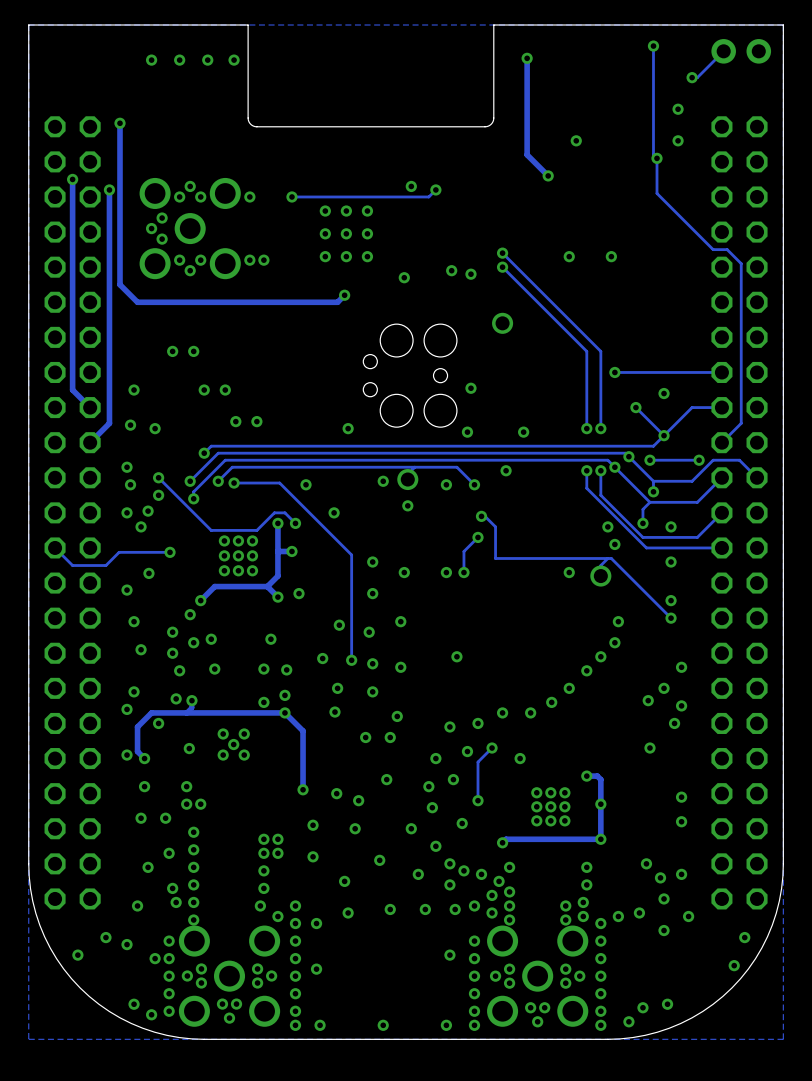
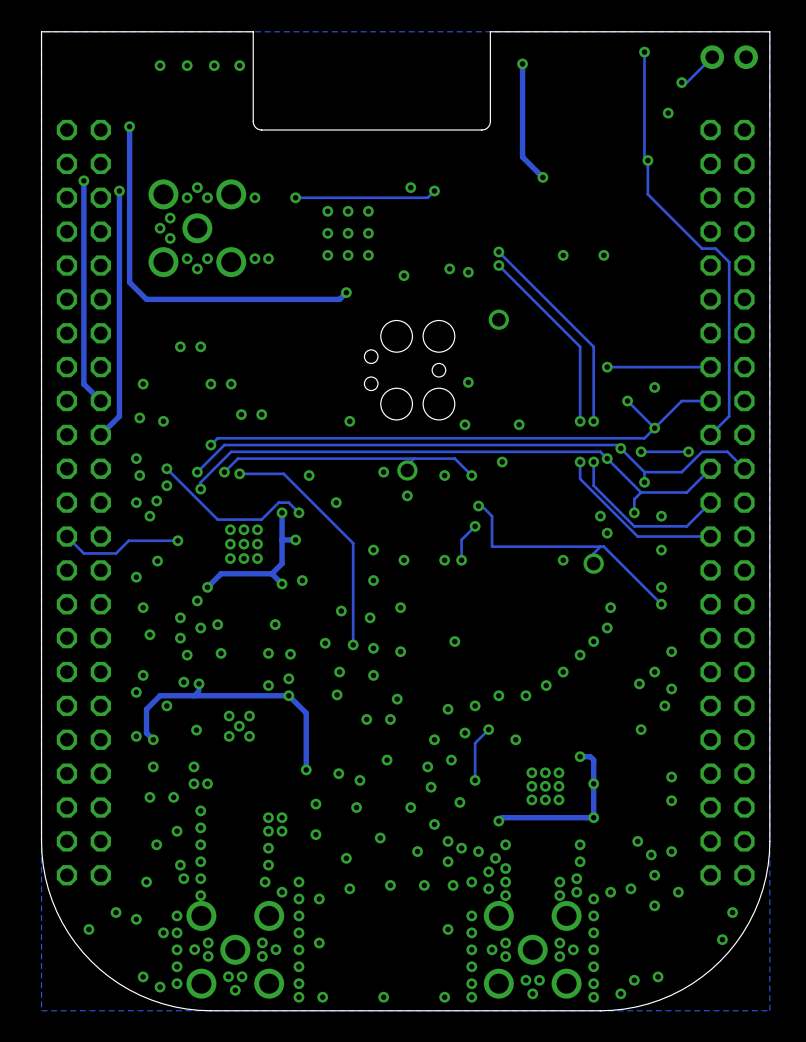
via: (576, 140) -> none
via: (678, 140) -> none

